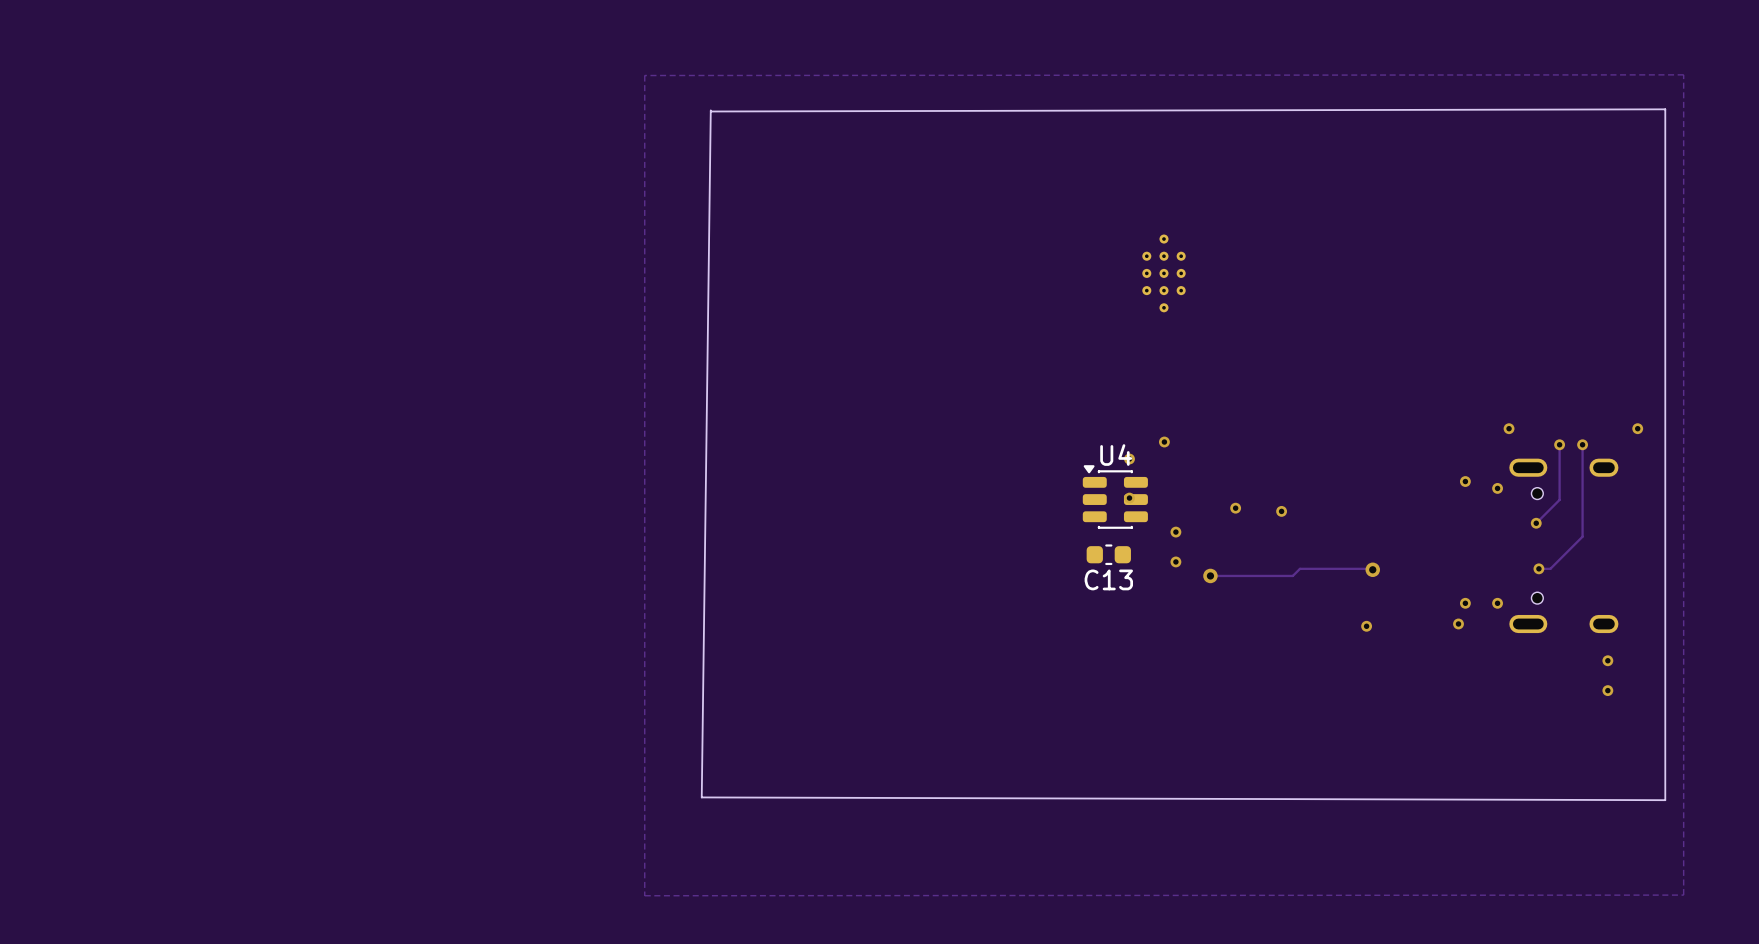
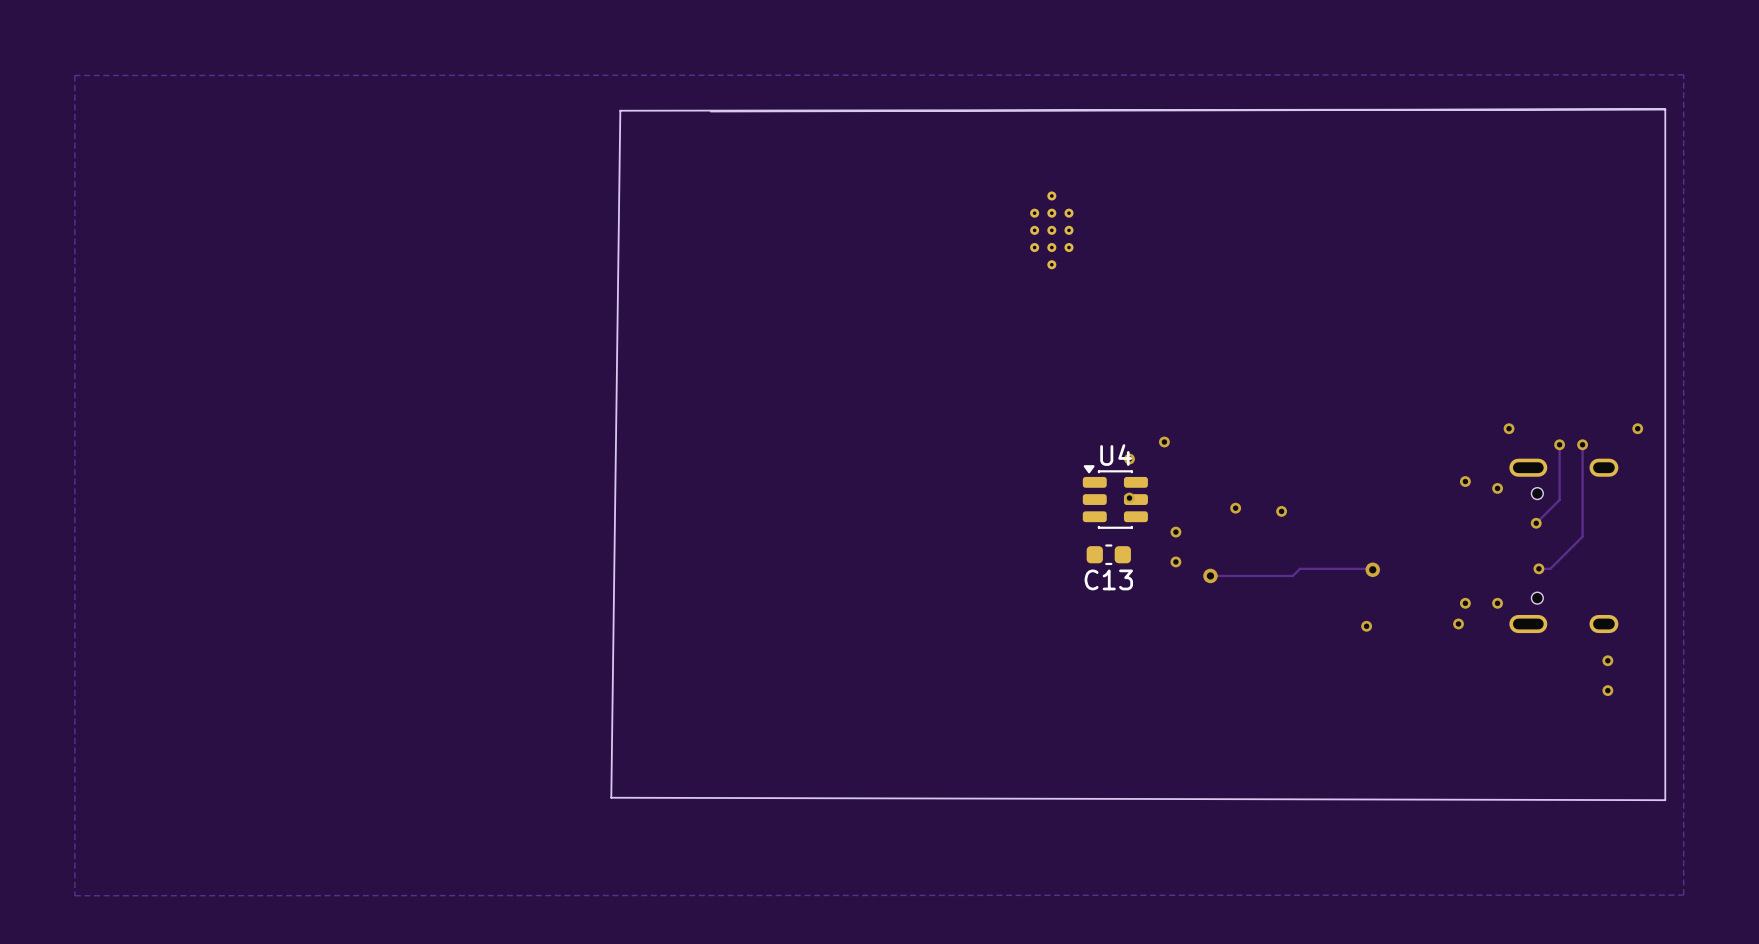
zone outline: (1683, 74) (644, 75) (644, 895) (1683, 895) -> (1683, 74) (74, 75) (74, 895) (1683, 895)
board edge: (710, 110) (701, 797) (1665, 800) -> (1665, 109) (620, 110) (611, 797) (1665, 800)
part position: (1163, 273) -> (1051, 230)

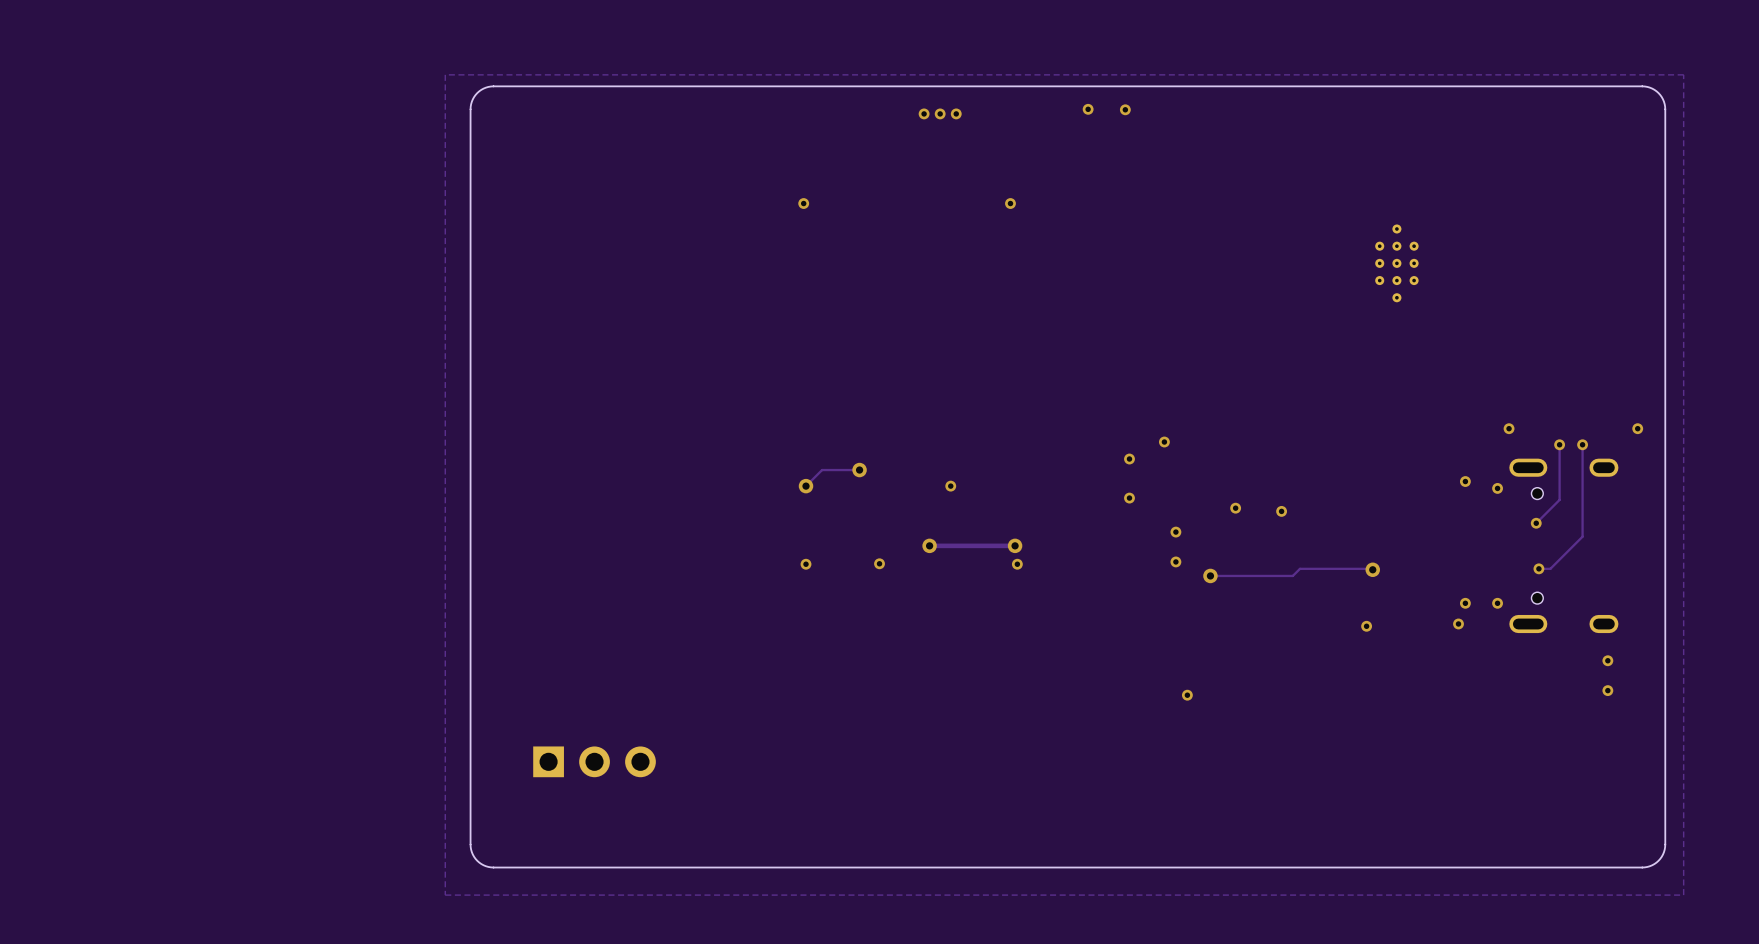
zone outline: (1683, 74) (74, 75) (74, 895) (1683, 895) -> (1683, 74) (445, 74) (445, 895) (1683, 895)
via: none -> (1088, 109)
via: none -> (1125, 109)
board edge: (710, 111) (1665, 109) (620, 110) (611, 797) (1665, 800) -> (1665, 109) (1663, 99) (1658, 93) (1652, 88) (1642, 86) (493, 86) (481, 89) (474, 97) (470, 109) (470, 844) (471, 852) (477, 860) (483, 865) (493, 867) (1642, 867) (1656, 862) (1663, 852) (1665, 800)
via: none -> (924, 113)
via: none -> (940, 113)
via: none -> (956, 113)
via: none -> (803, 203)
via: none -> (1010, 203)
part position: (1051, 230) -> (1396, 263)
track: none -> (859, 470) (822, 470) (806, 486)
via: none -> (859, 470)
via: none -> (806, 486)
via: none -> (950, 486)
U4: (1115, 497) -> none
via: none -> (929, 545)
track: none -> (1015, 545) (929, 545)
via: none -> (1015, 545)
C13: (1108, 554) -> none
via: none -> (879, 563)
via: none -> (806, 564)
via: none -> (1017, 564)
via: none -> (1187, 695)
part: none -> (594, 761)

